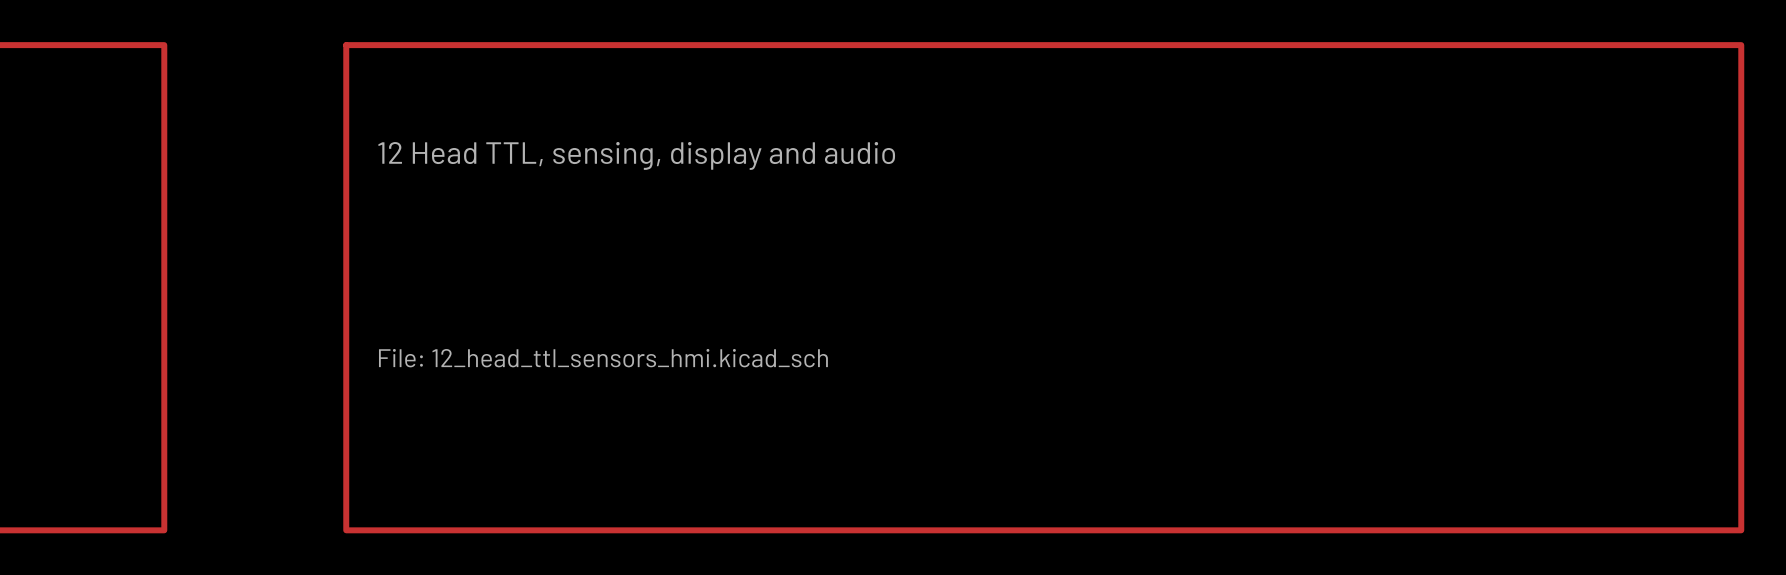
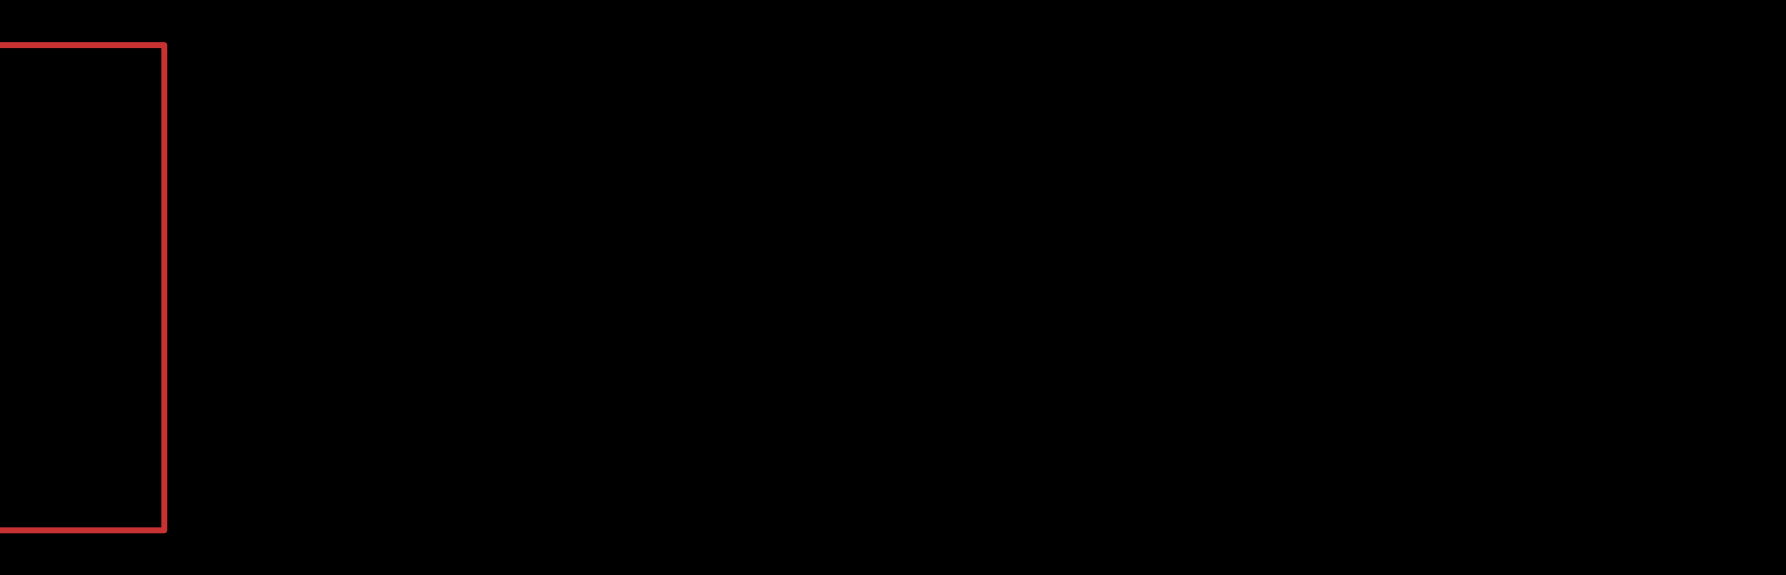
sheet 12 Head TTL, sensing, display and audio: File: 12_head_ttl_sensors_hmi.kicad_sch (1043, 287) -> none

